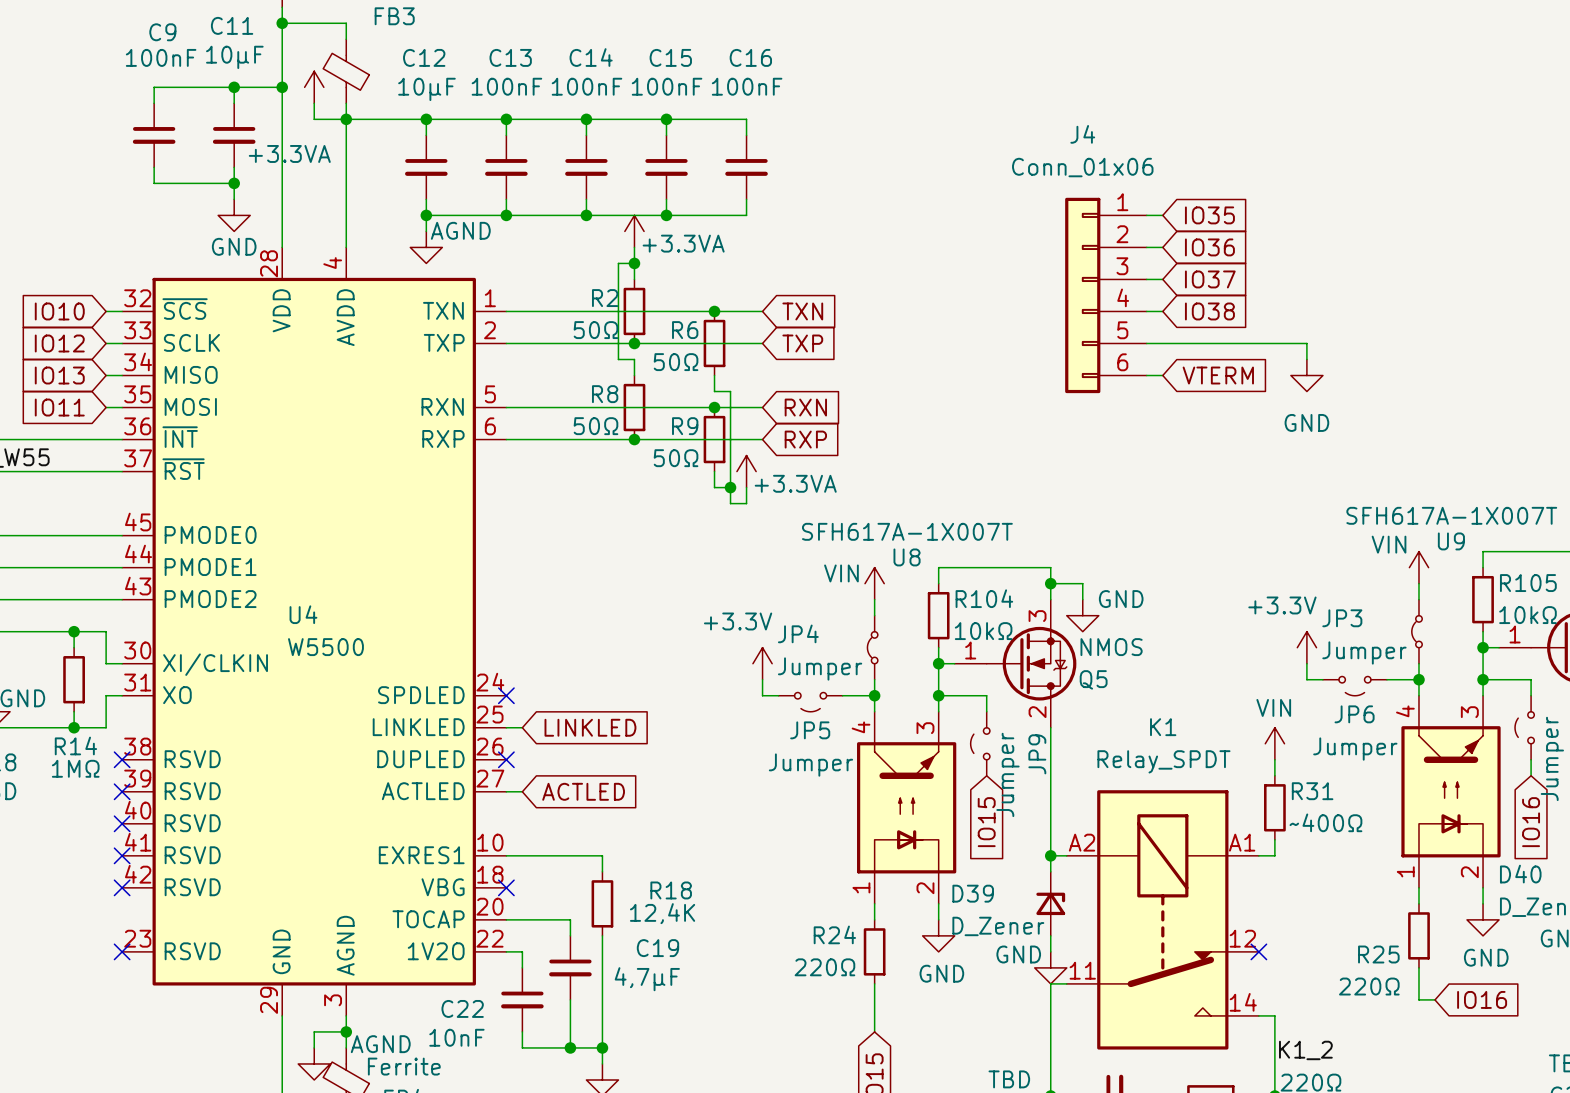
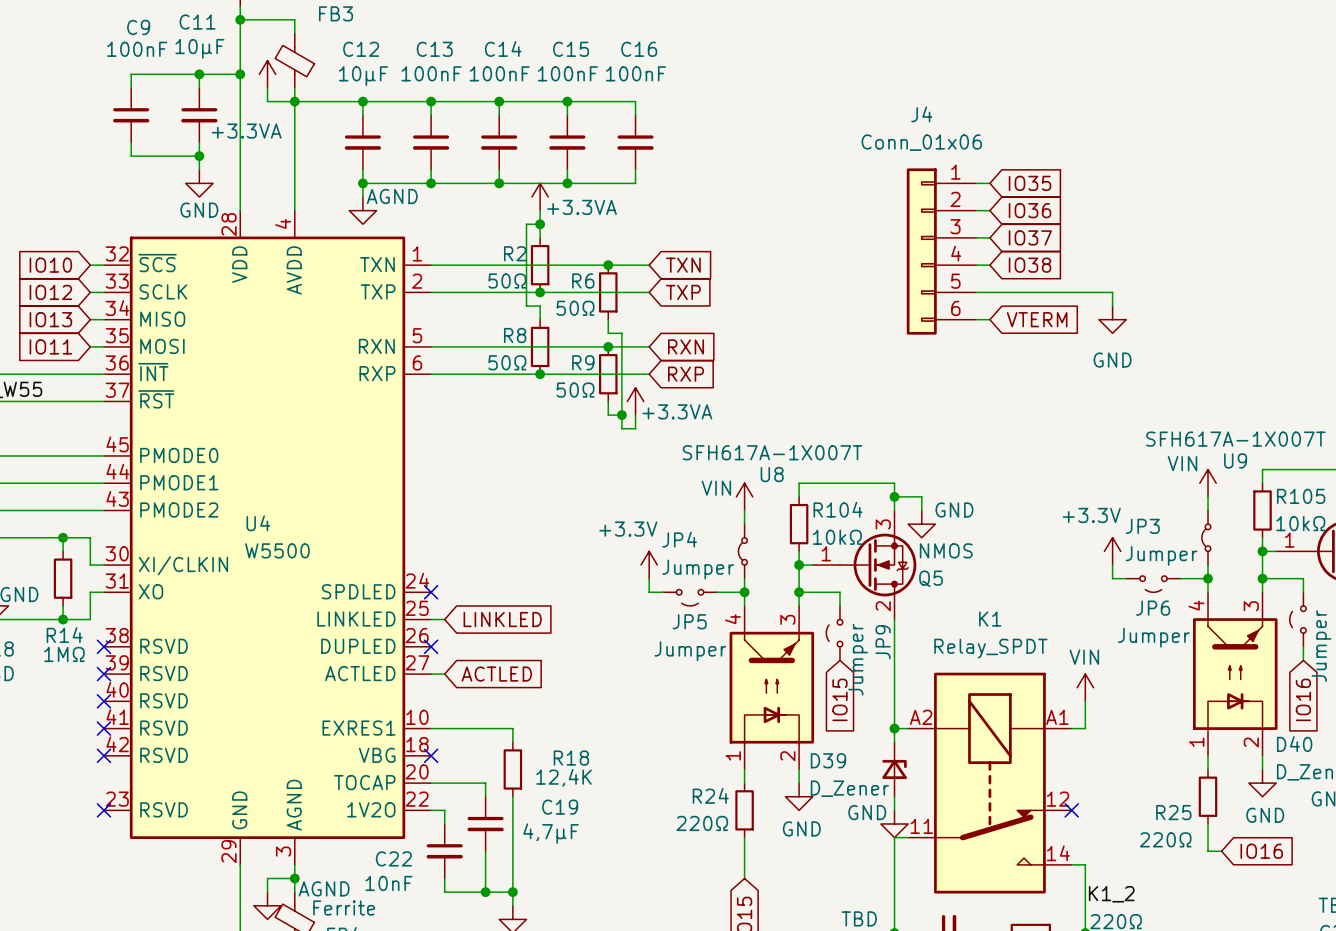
power symbol position: VIN (1274, 743) -> VIN (1085, 687)
R31: ~400Ω (1274, 807) -> none

